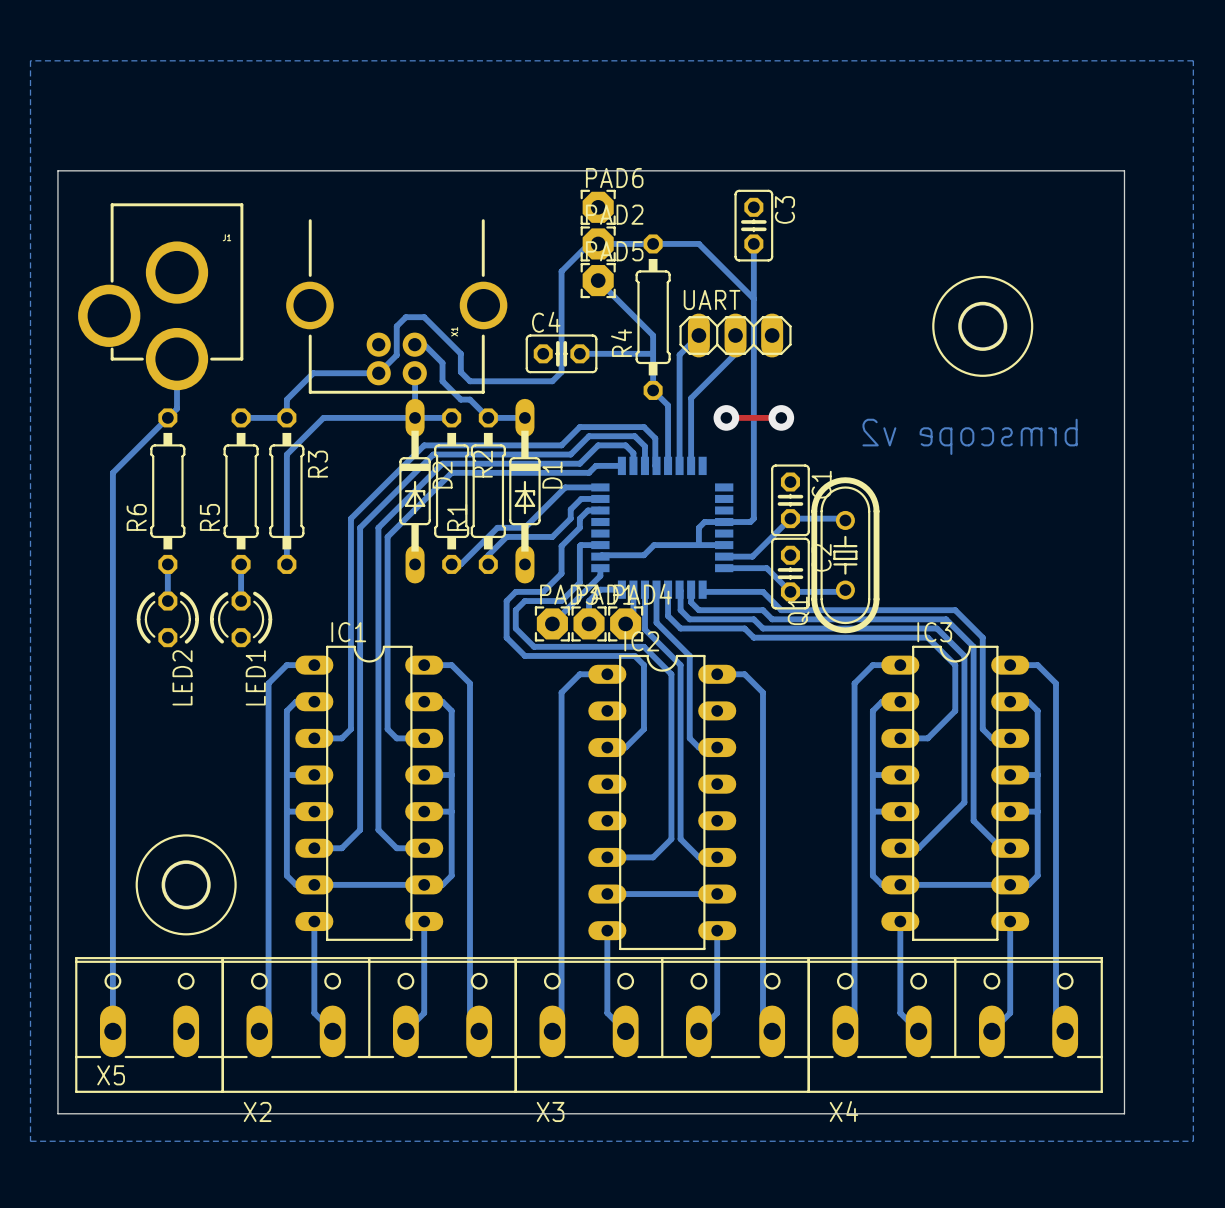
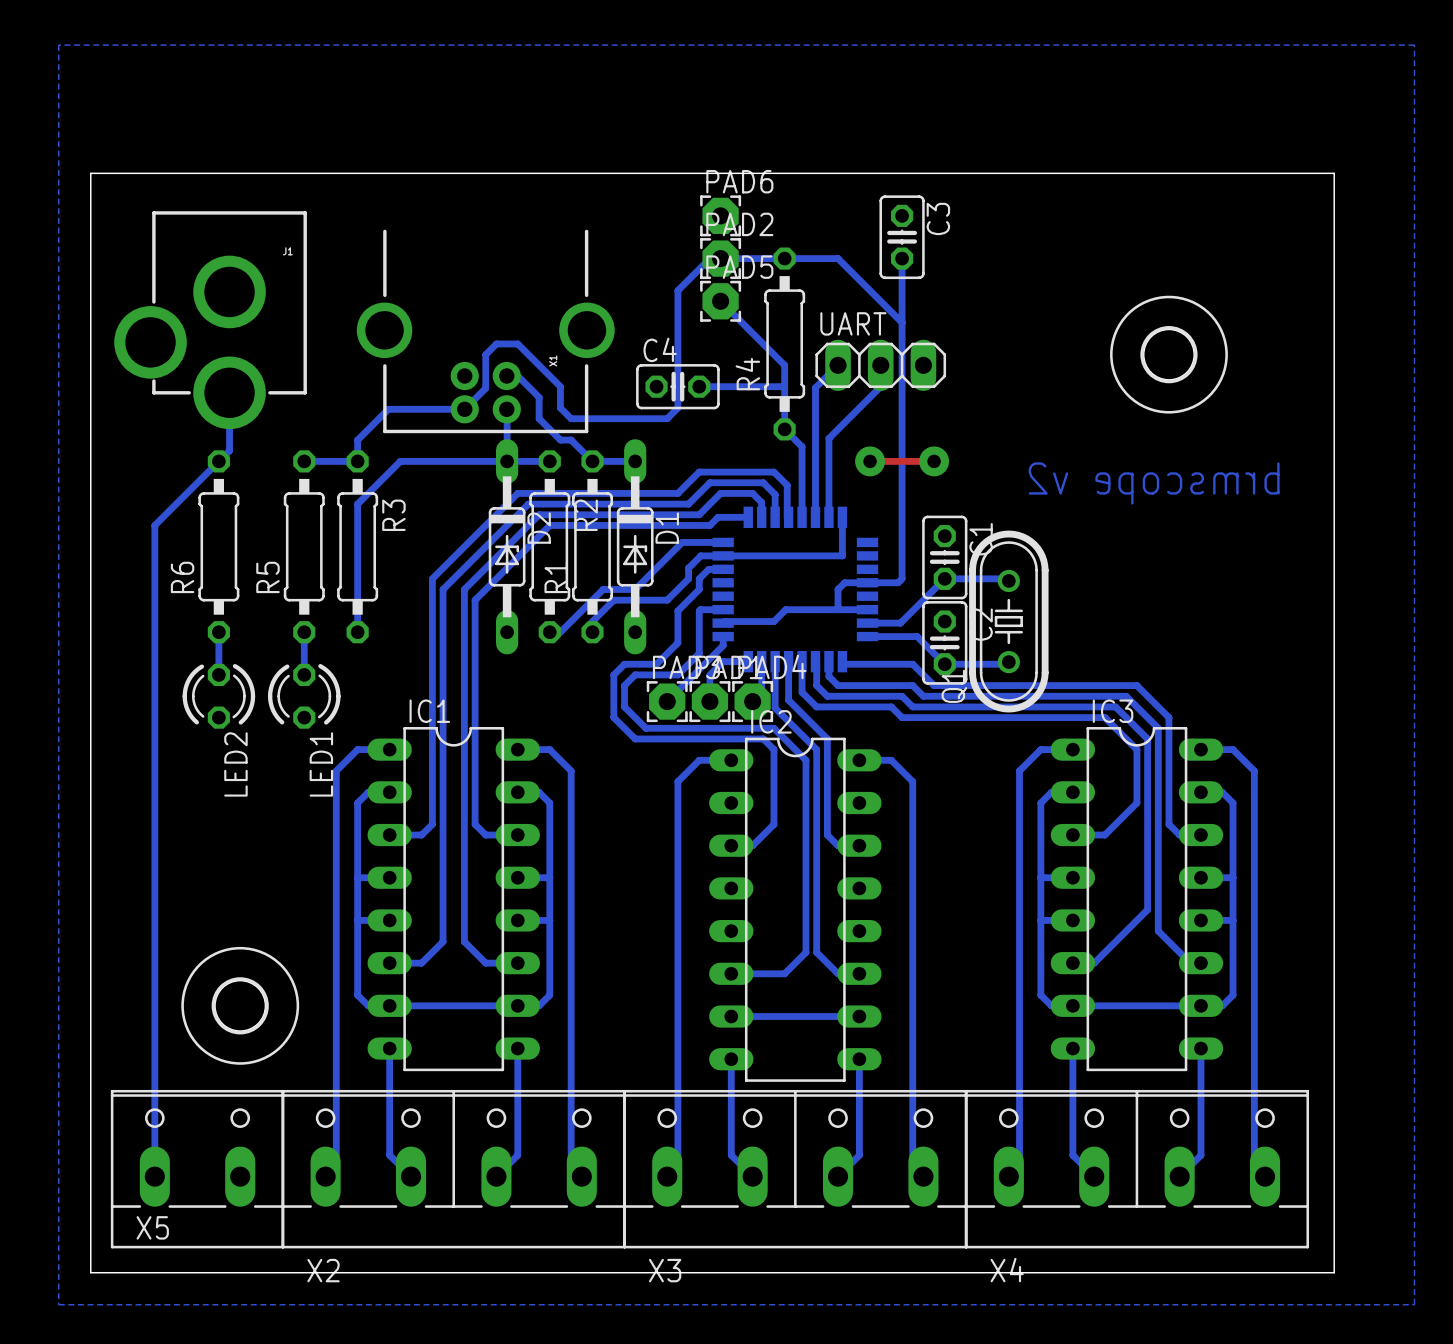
bottom track: none -> (842, 517) (842, 555) (723, 555)

